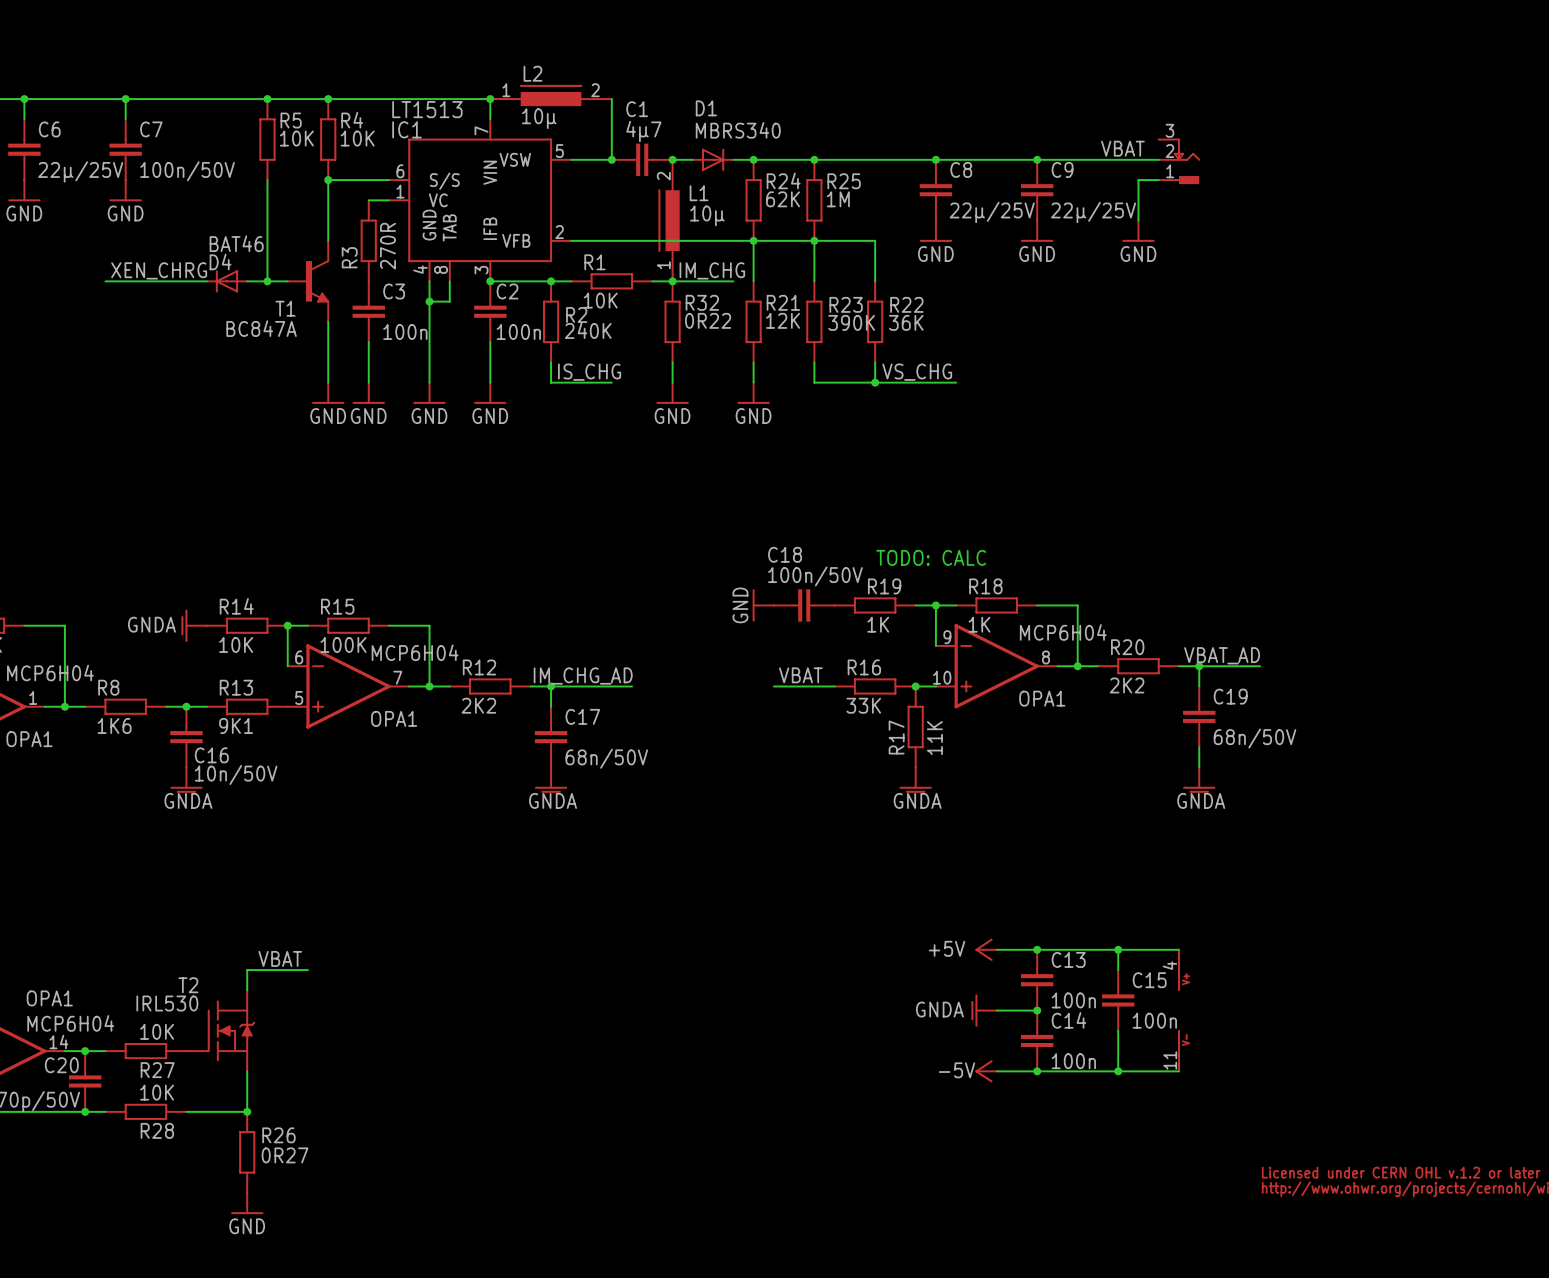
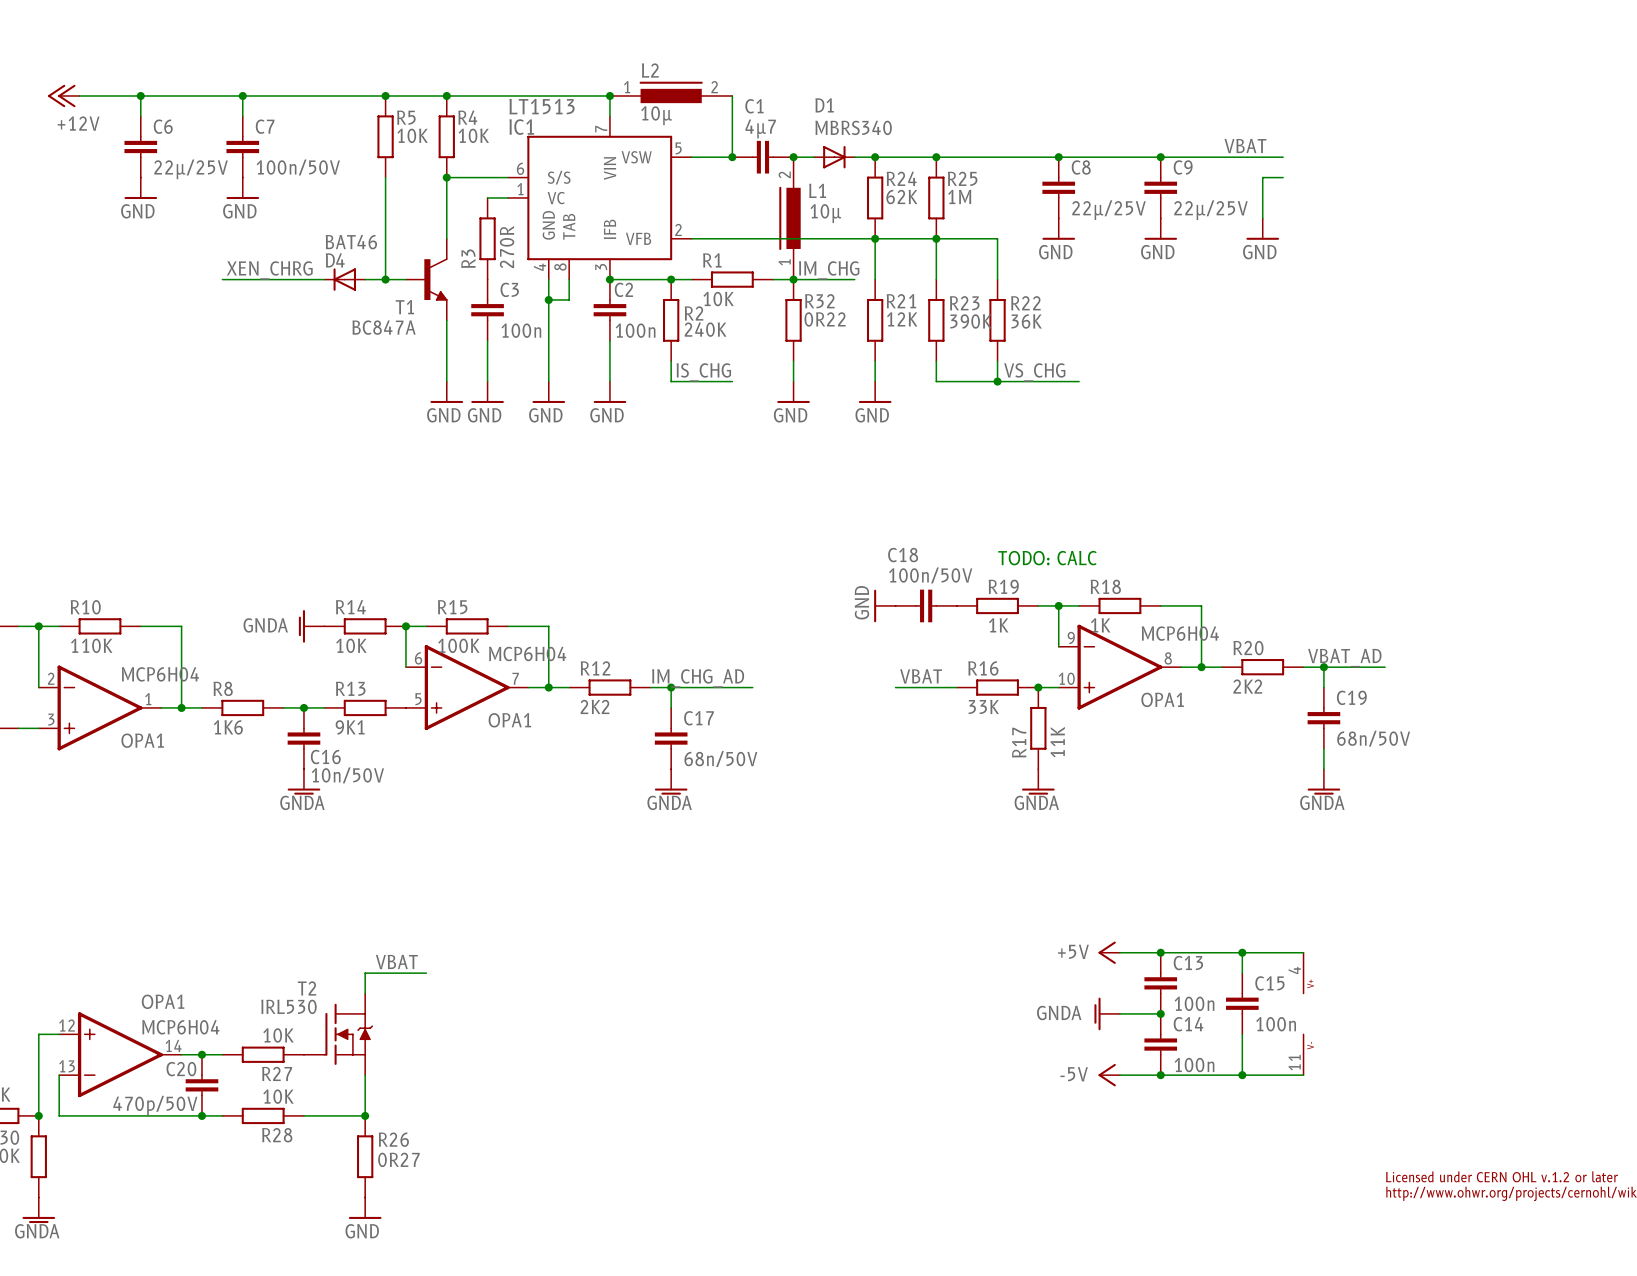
part: (1179, 149) -> none
part: (1179, 180) -> none

